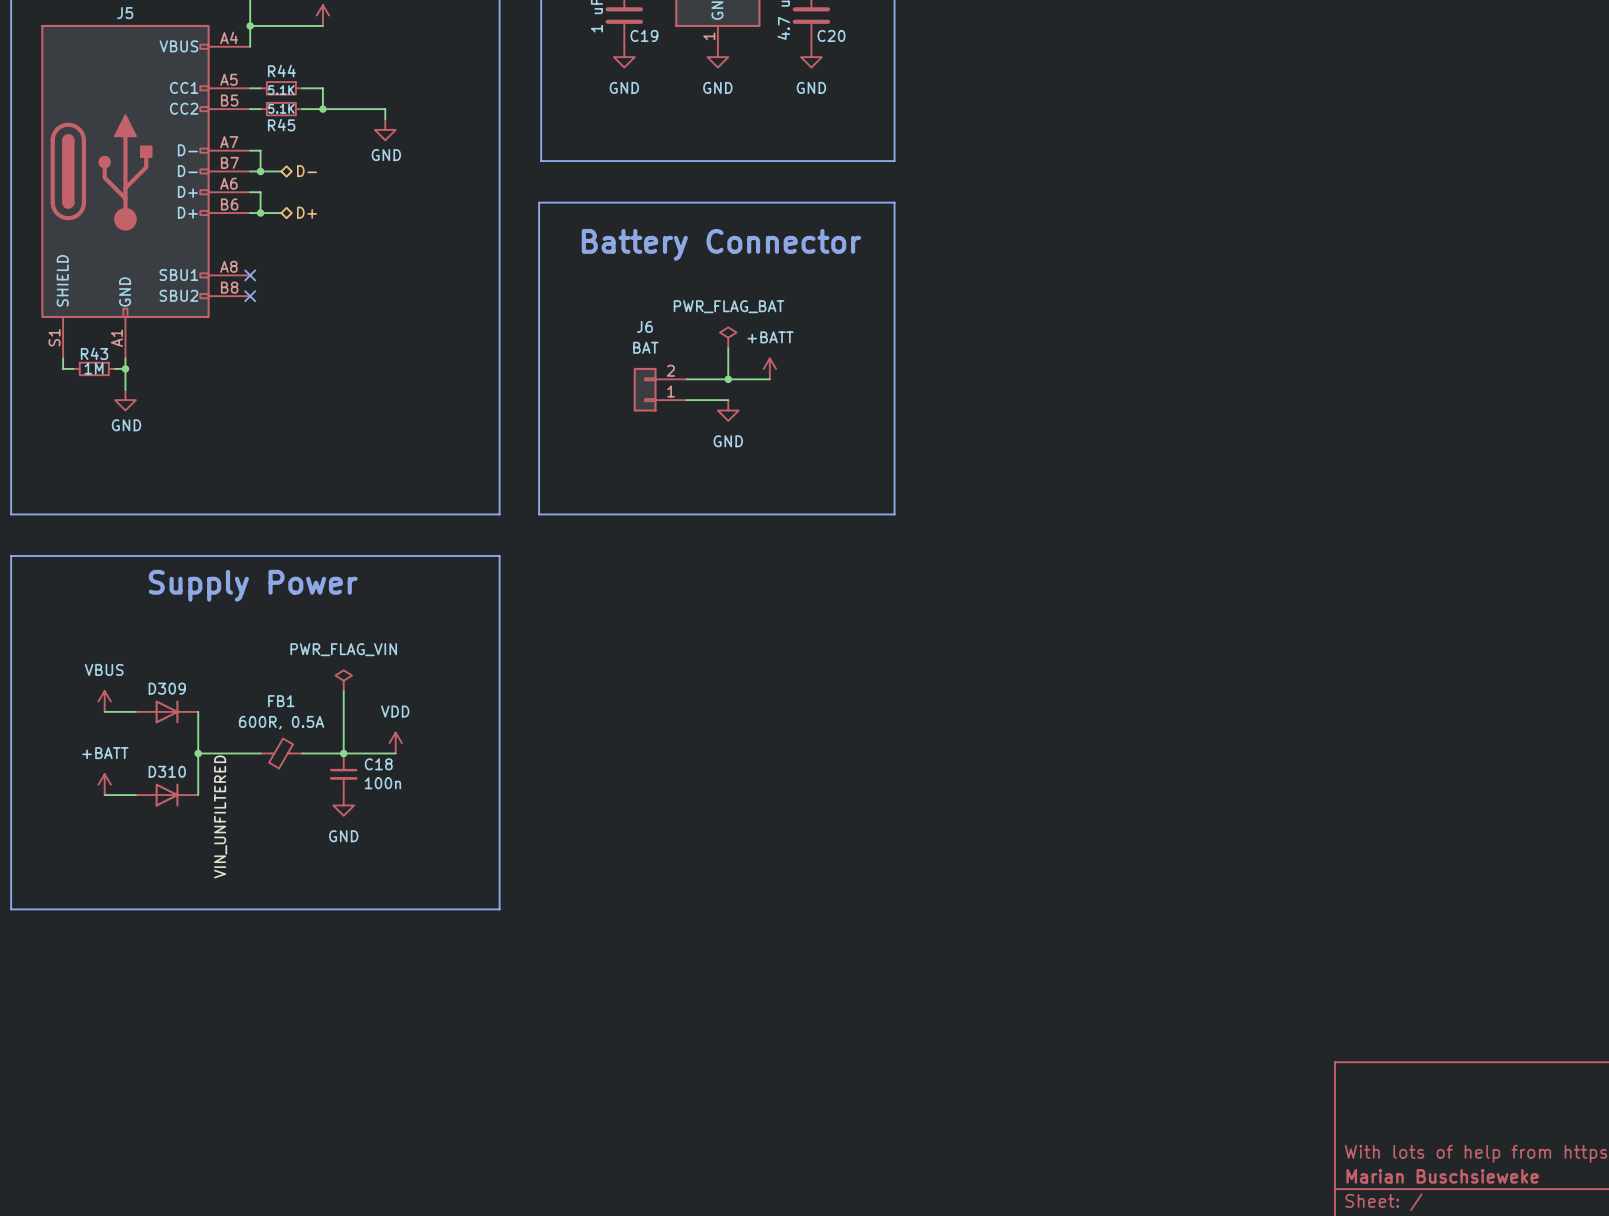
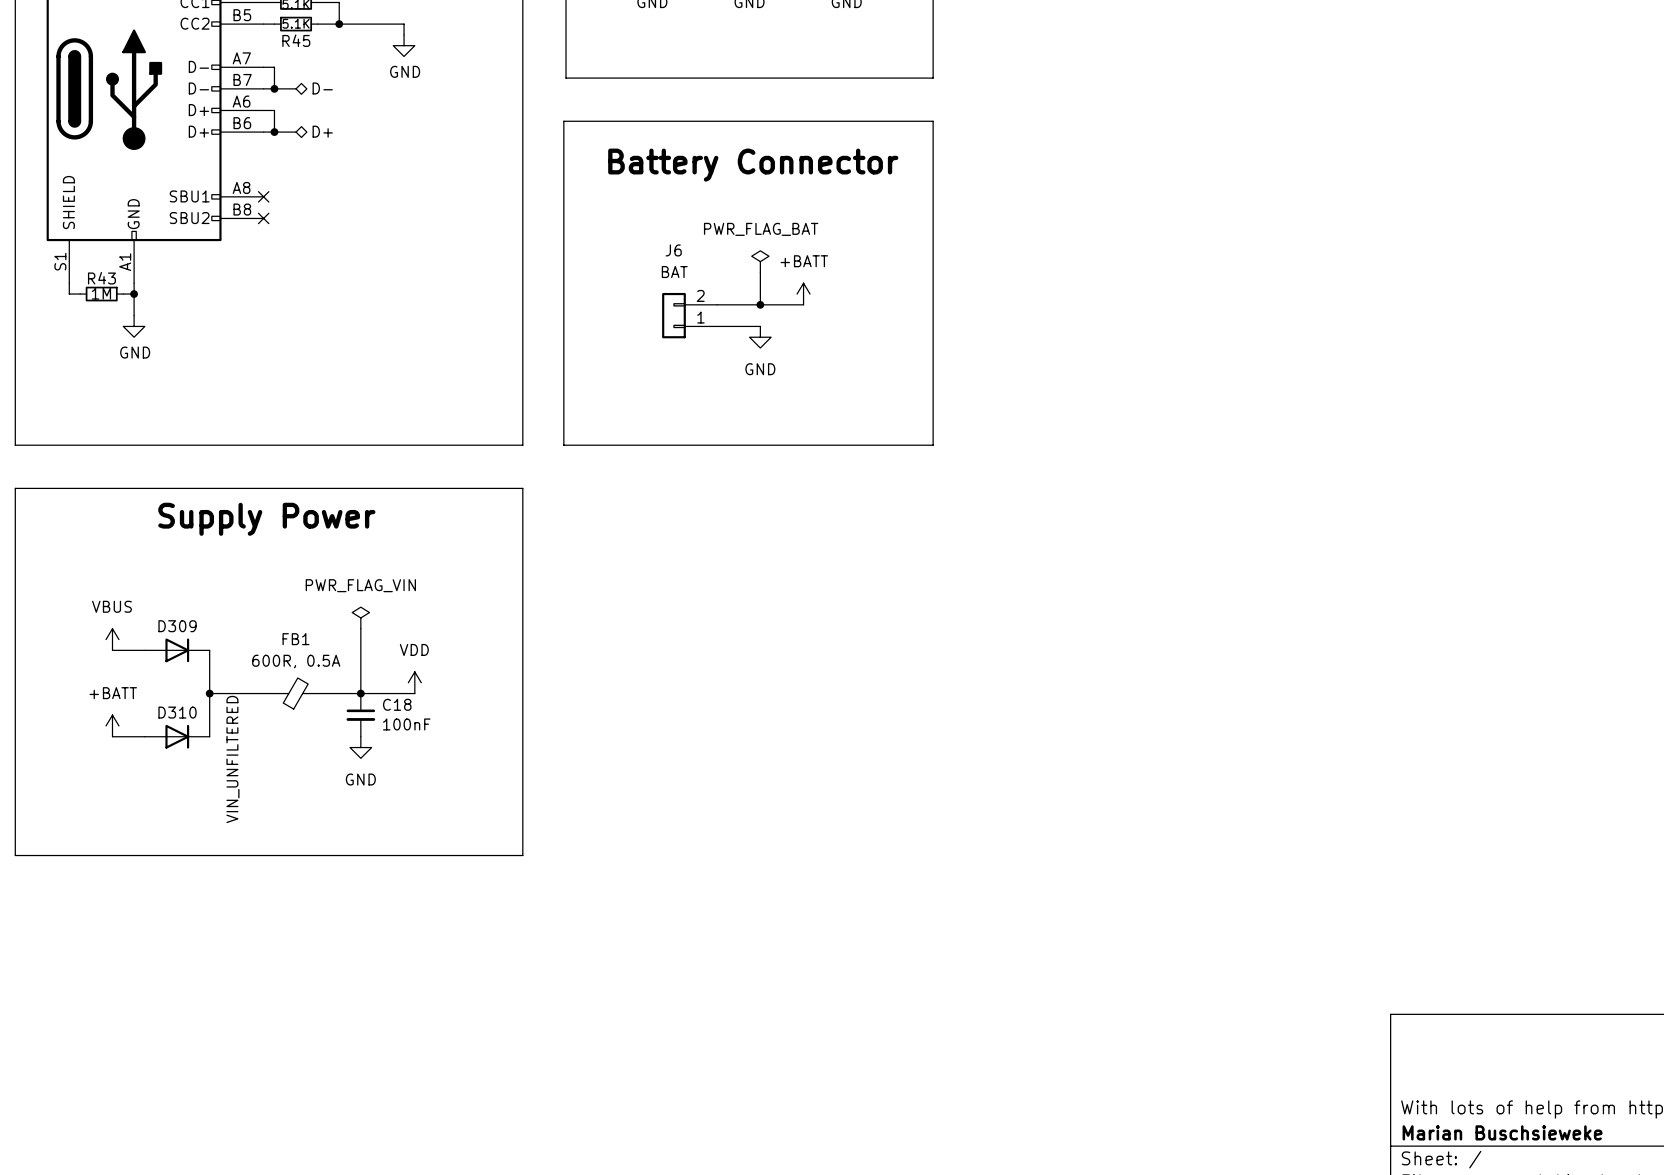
C18 value: 100n (382, 783) -> 100nF (406, 724)

